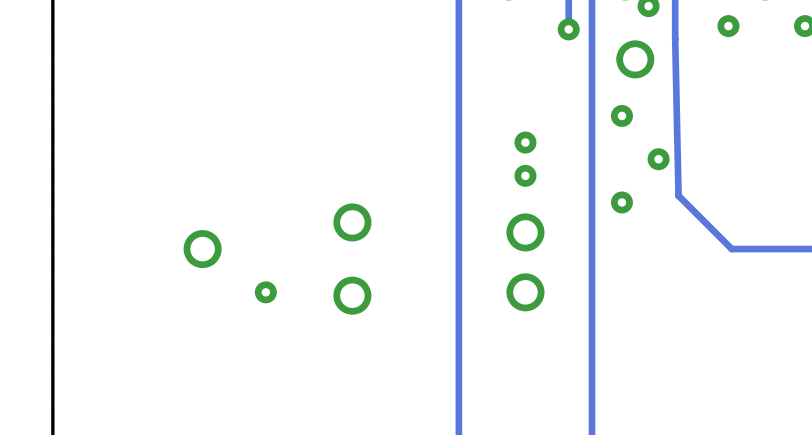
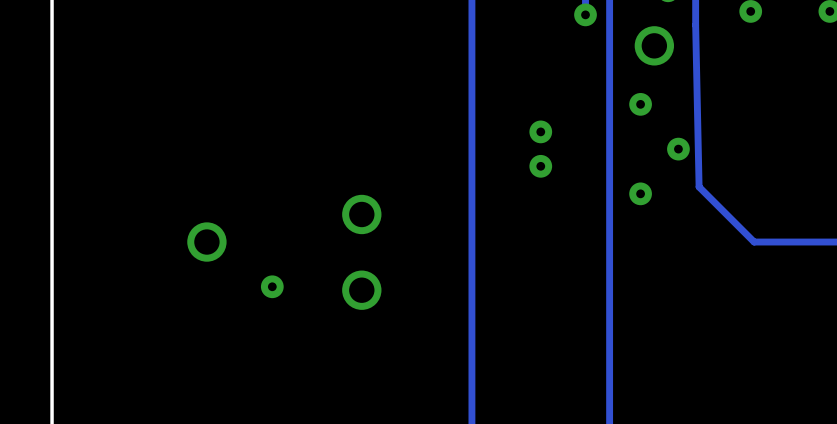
part: (525, 232) -> none
part: (525, 292) -> none

